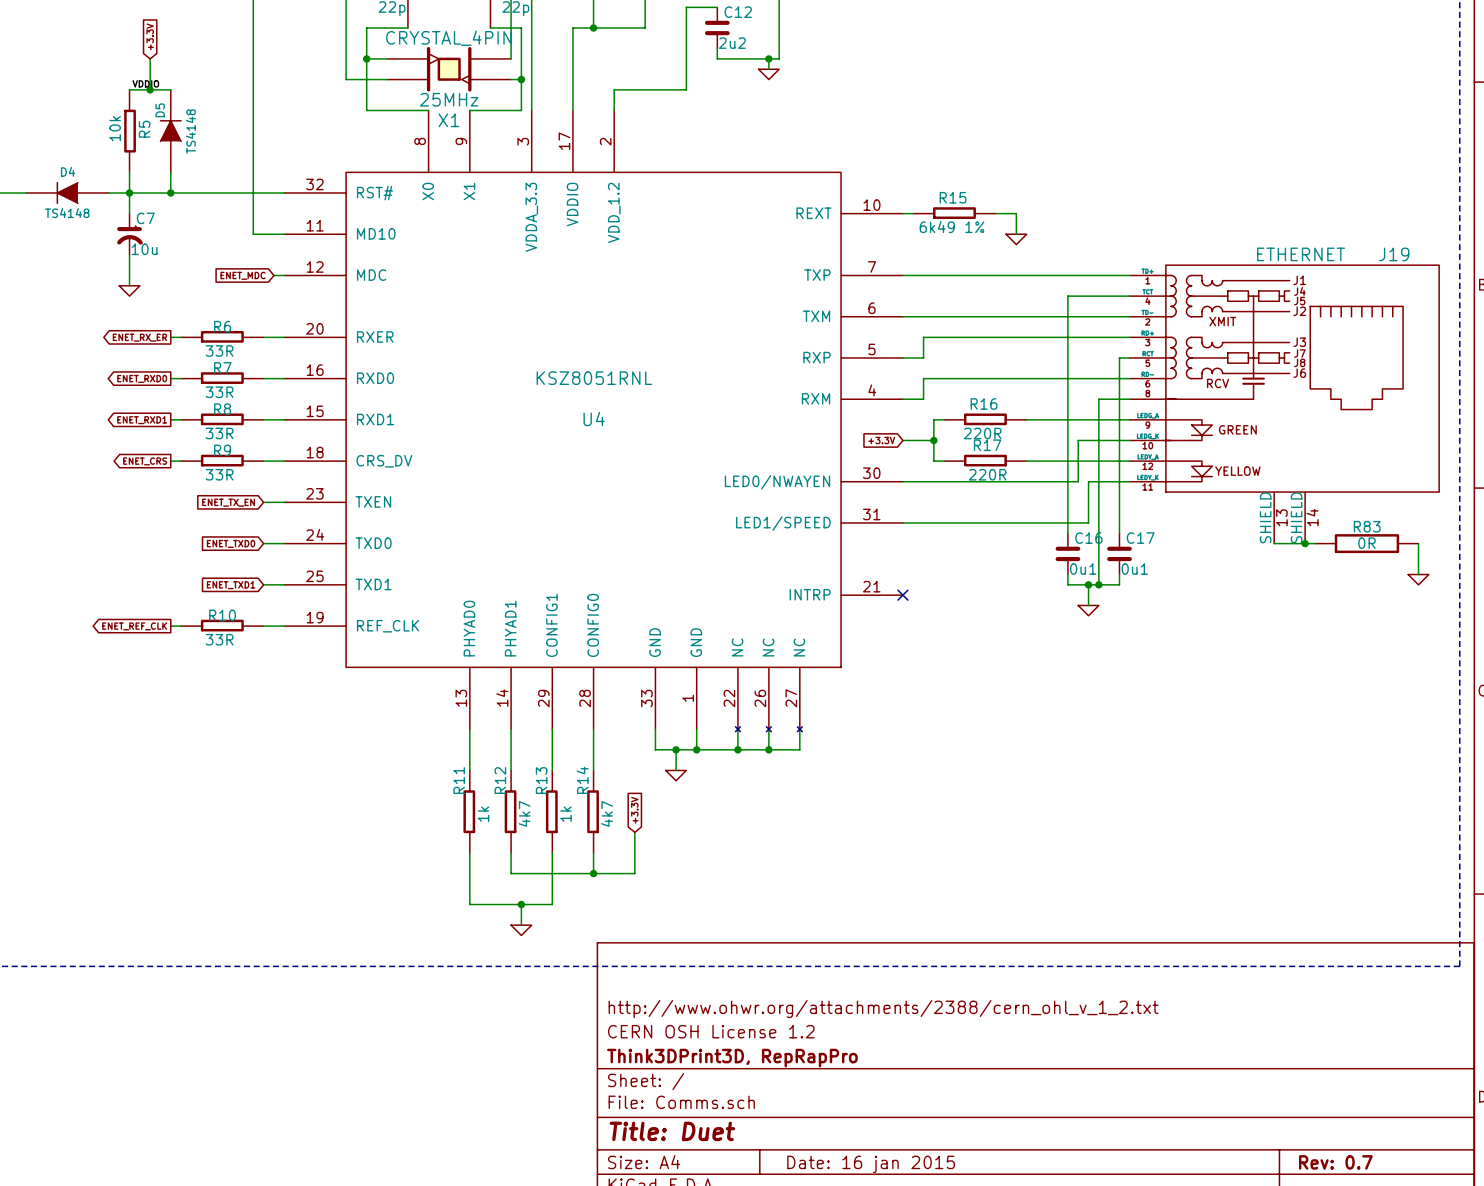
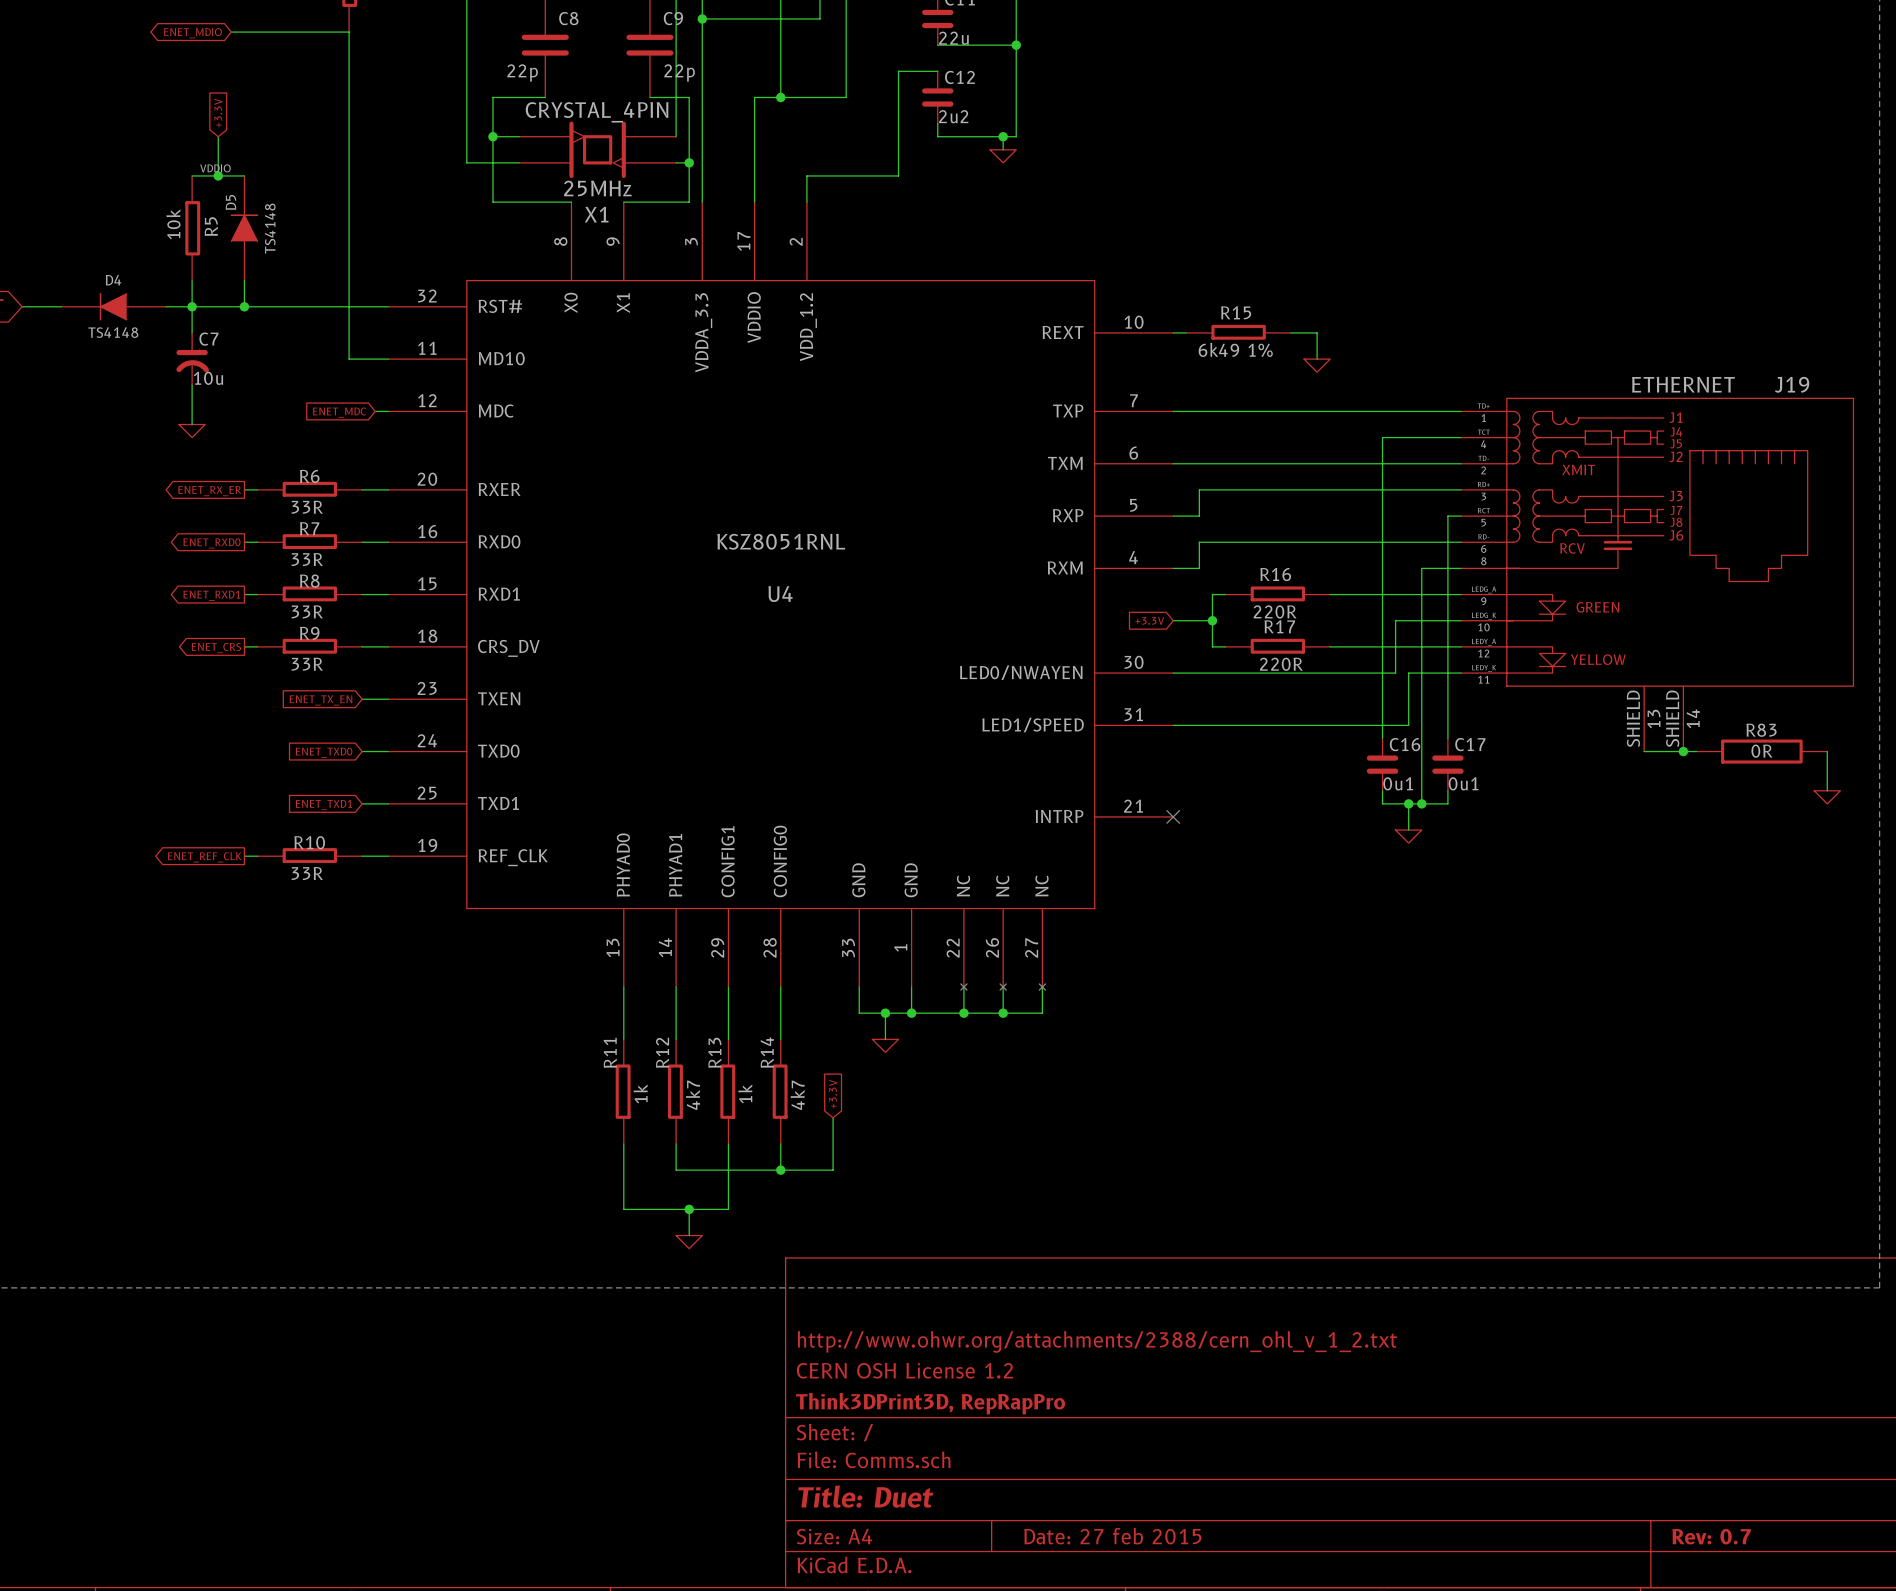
title block: Date: 16 jan 2015 (871, 1164) -> Date: 27 feb 2015 (1112, 1536)

